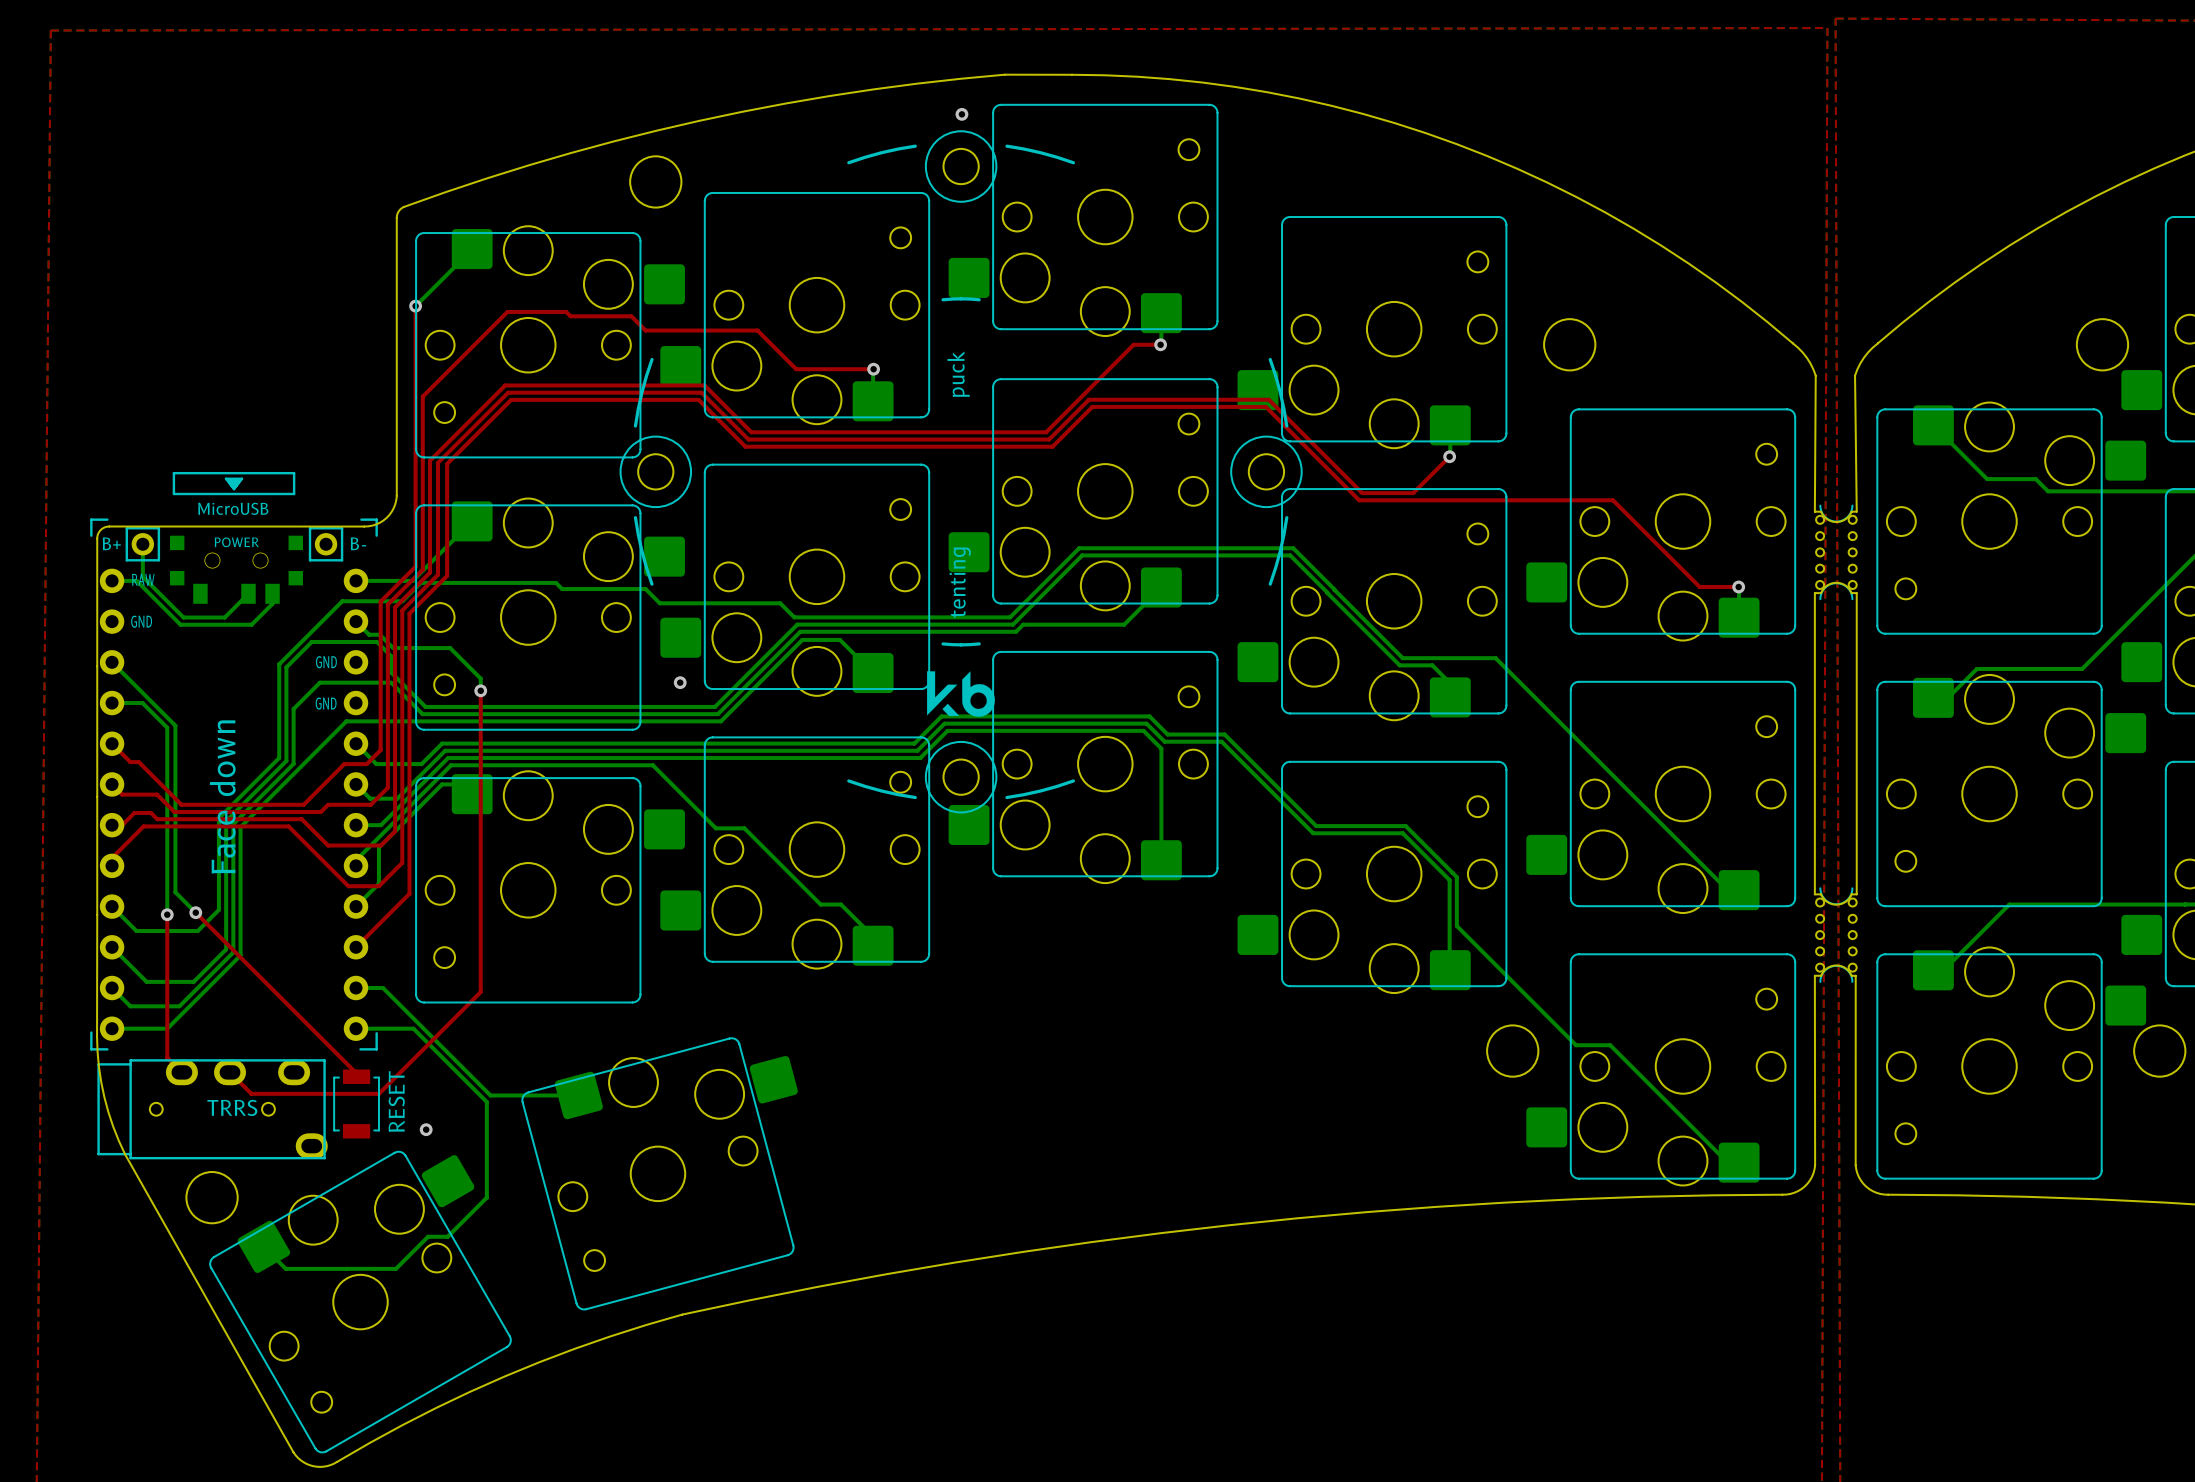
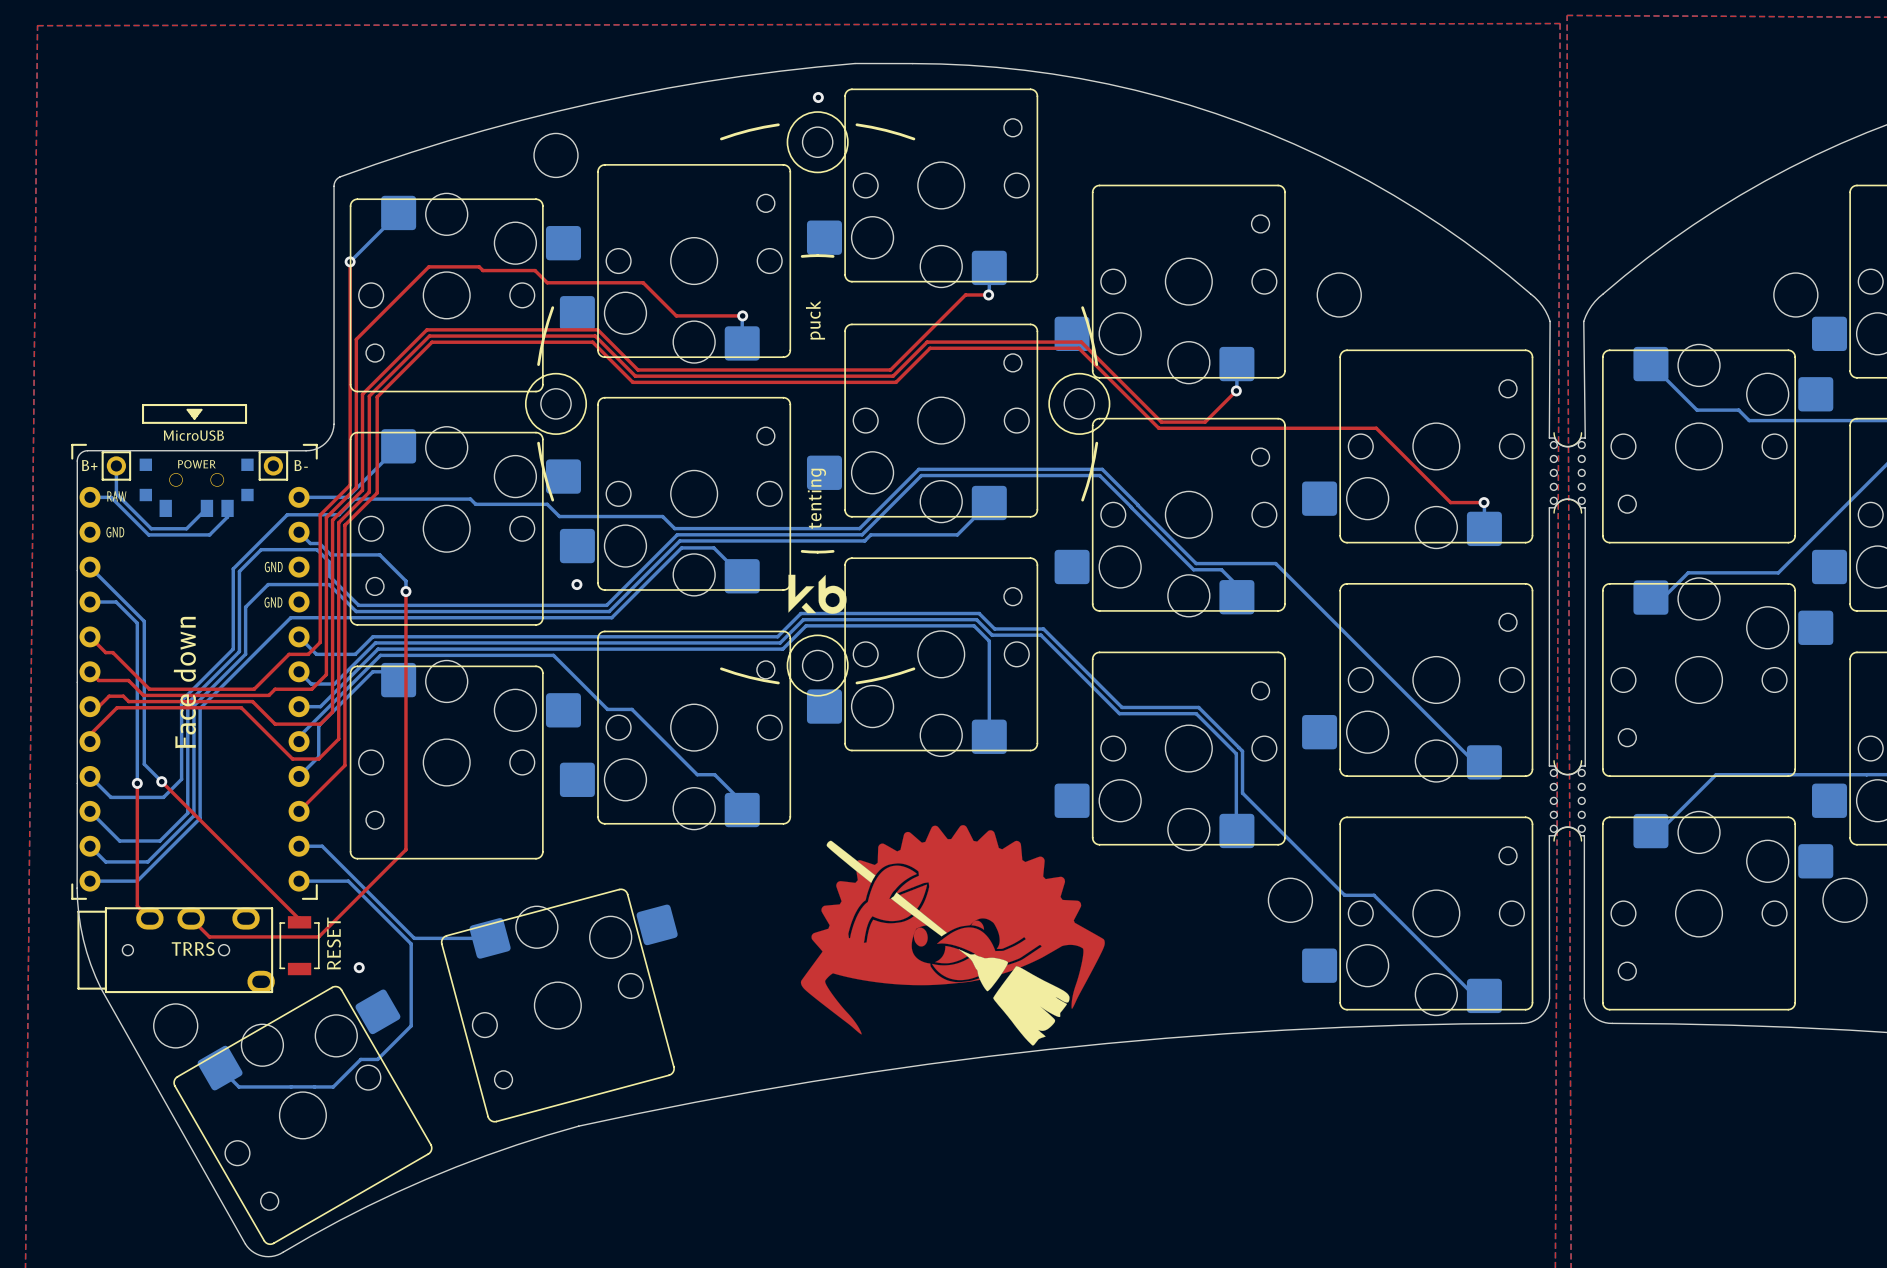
drawing: none -> [800, 825, 1105, 1046]

